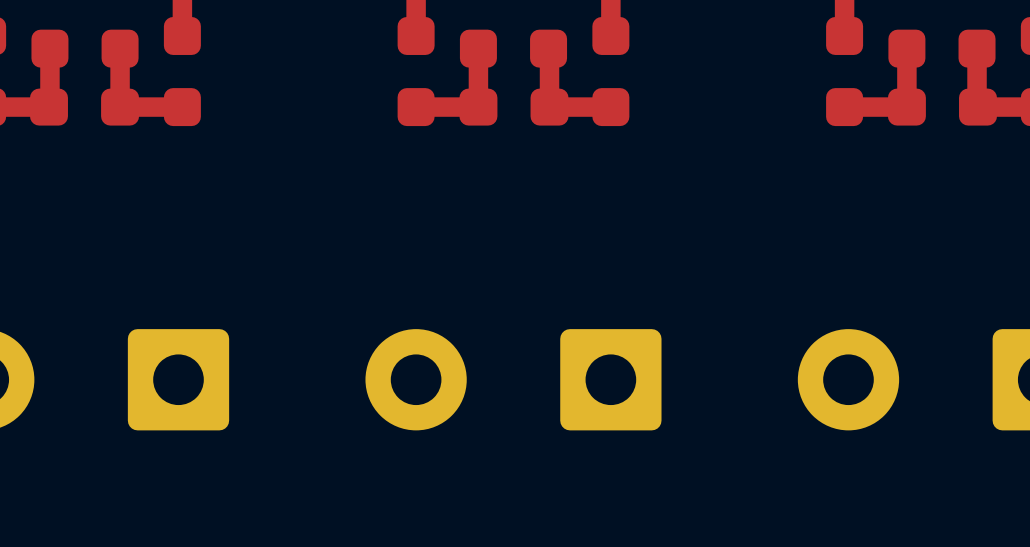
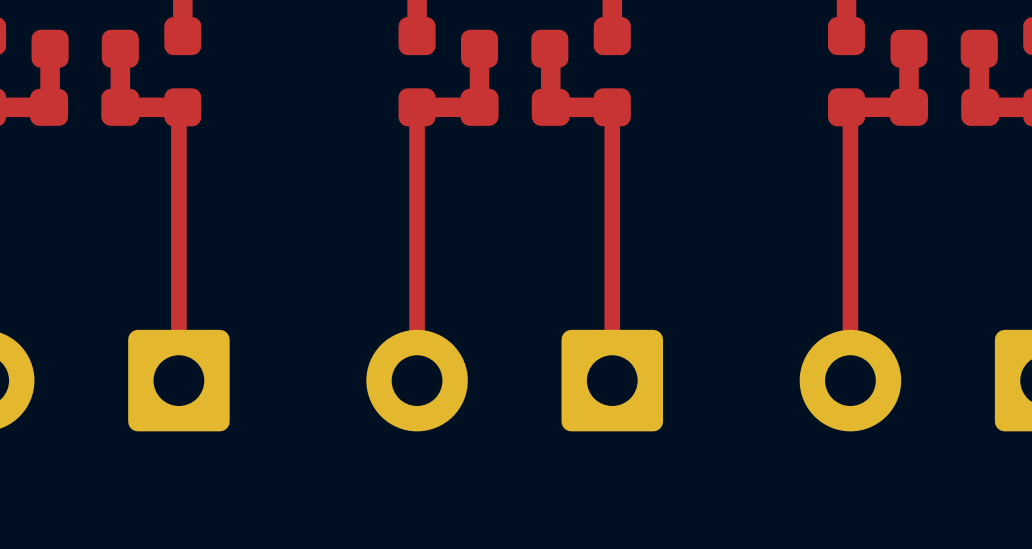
top track: none -> (182, 107) (178, 111) (178, 380)
top track: none -> (417, 107) (417, 380)
top track: none -> (612, 107) (612, 380)
top track: none -> (846, 107) (850, 111) (850, 380)

